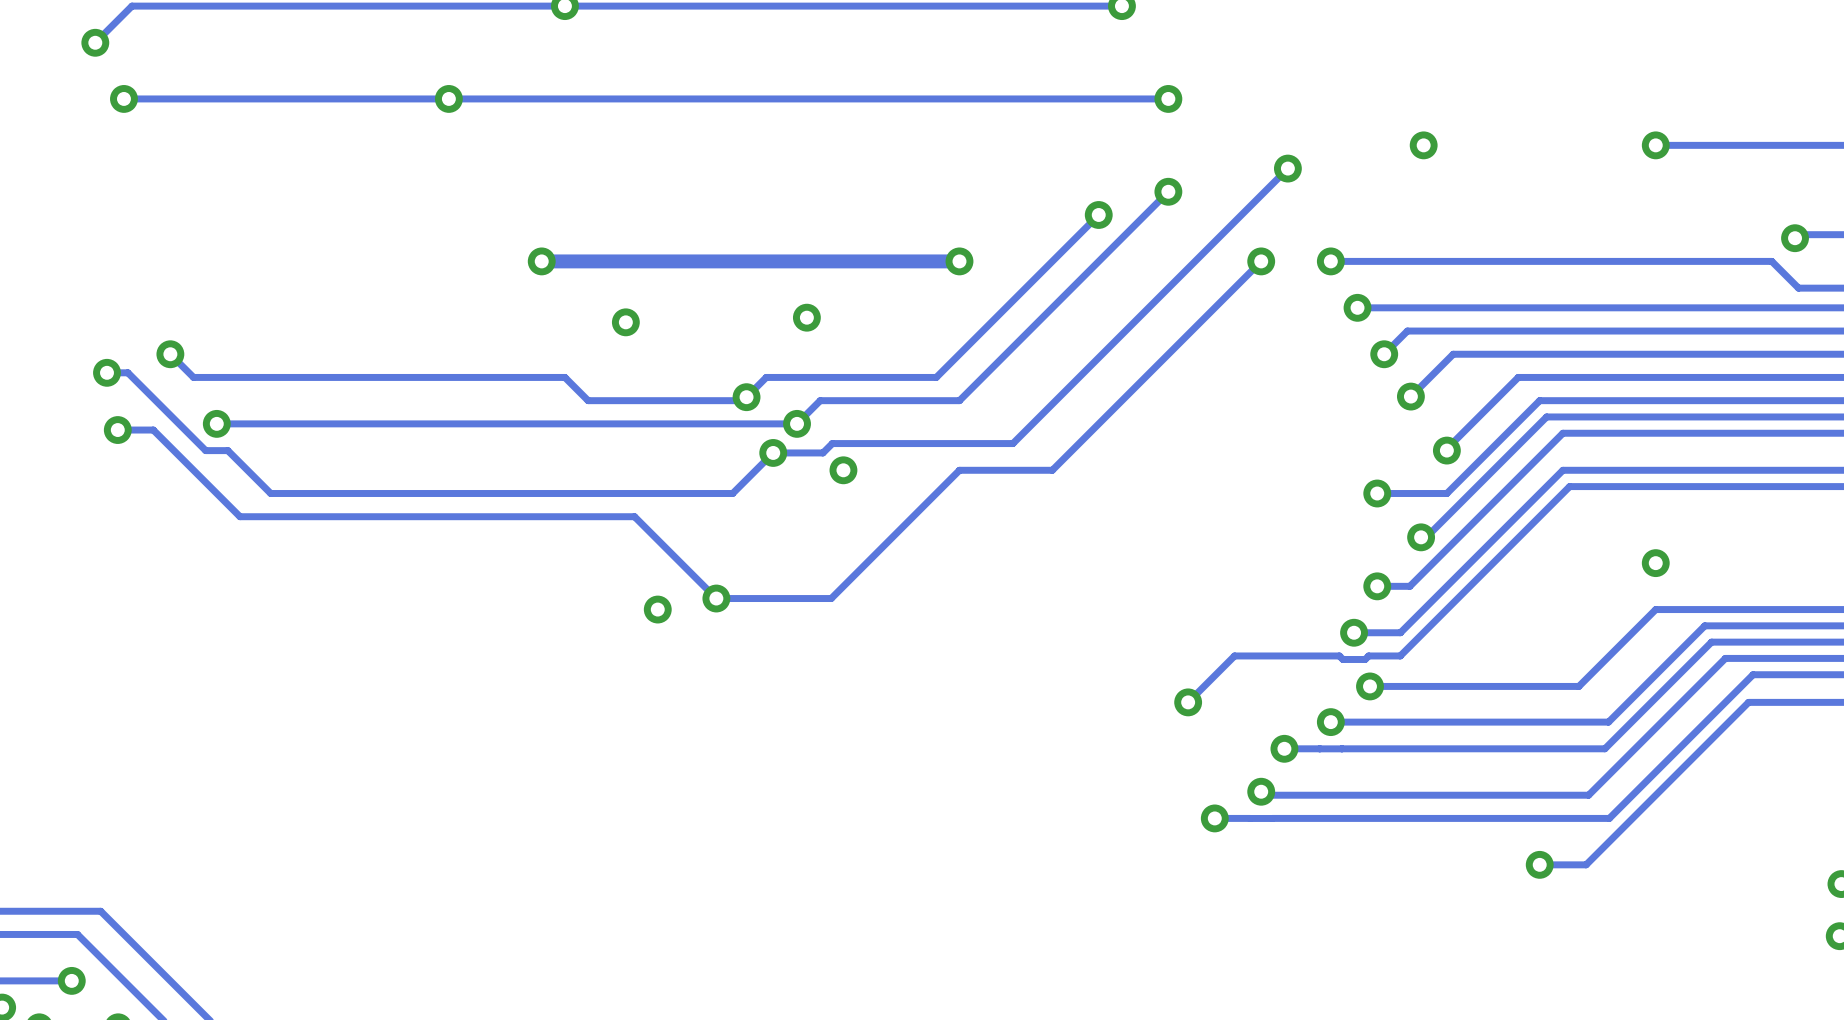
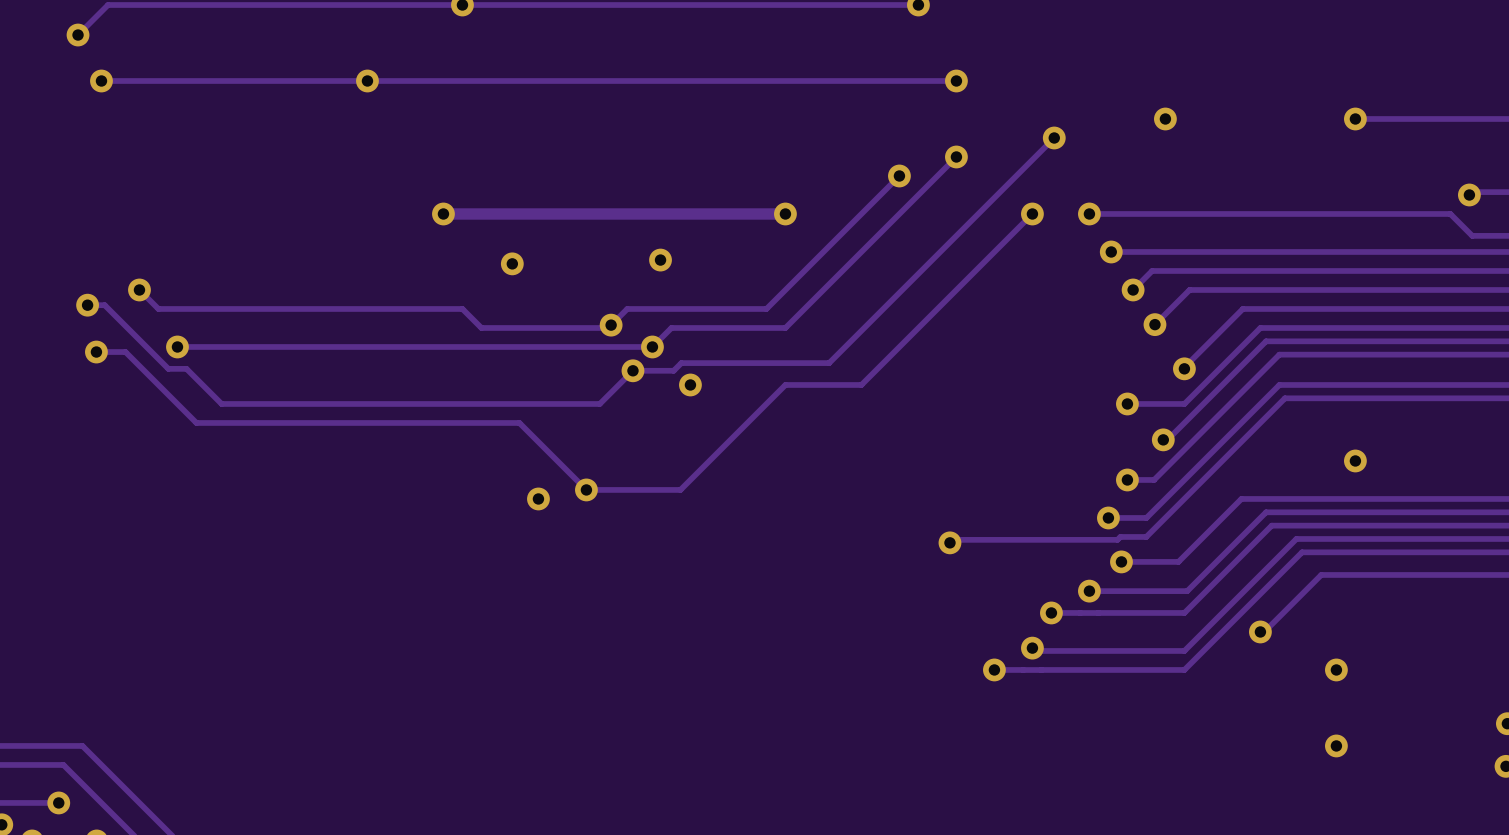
track: (1655, 609) (1590, 674) -> (1435, 552) (1302, 552)
track: (1704, 625) (1608, 722) (1450, 722) -> (1395, 512) (1266, 512) (1187, 591)
track: (1711, 642) (1604, 748) (1446, 748) -> (1401, 525) (1271, 525) (1184, 612)
track: (1725, 658) (1588, 795) (1446, 795) -> (1412, 538) (1296, 538) (1184, 650)
track: (1342, 659) (1339, 655) (1234, 655) (1188, 702) -> (1099, 539) (952, 539) (949, 542)
track: (1753, 674) (1609, 818) (1446, 818) -> (1292, 561) (1184, 669)
track: (1578, 686) (1439, 686) -> (1355, 498) (1241, 498) (1178, 561)
via position: (1188, 702) -> (949, 542)
track: (1748, 702) (1586, 864) (1539, 864) -> (1431, 574) (1321, 574) (1264, 631) (1260, 631)
via: none -> (1260, 631)
via: none -> (1336, 669)
via: (1539, 864) -> none
via: none -> (1336, 745)

